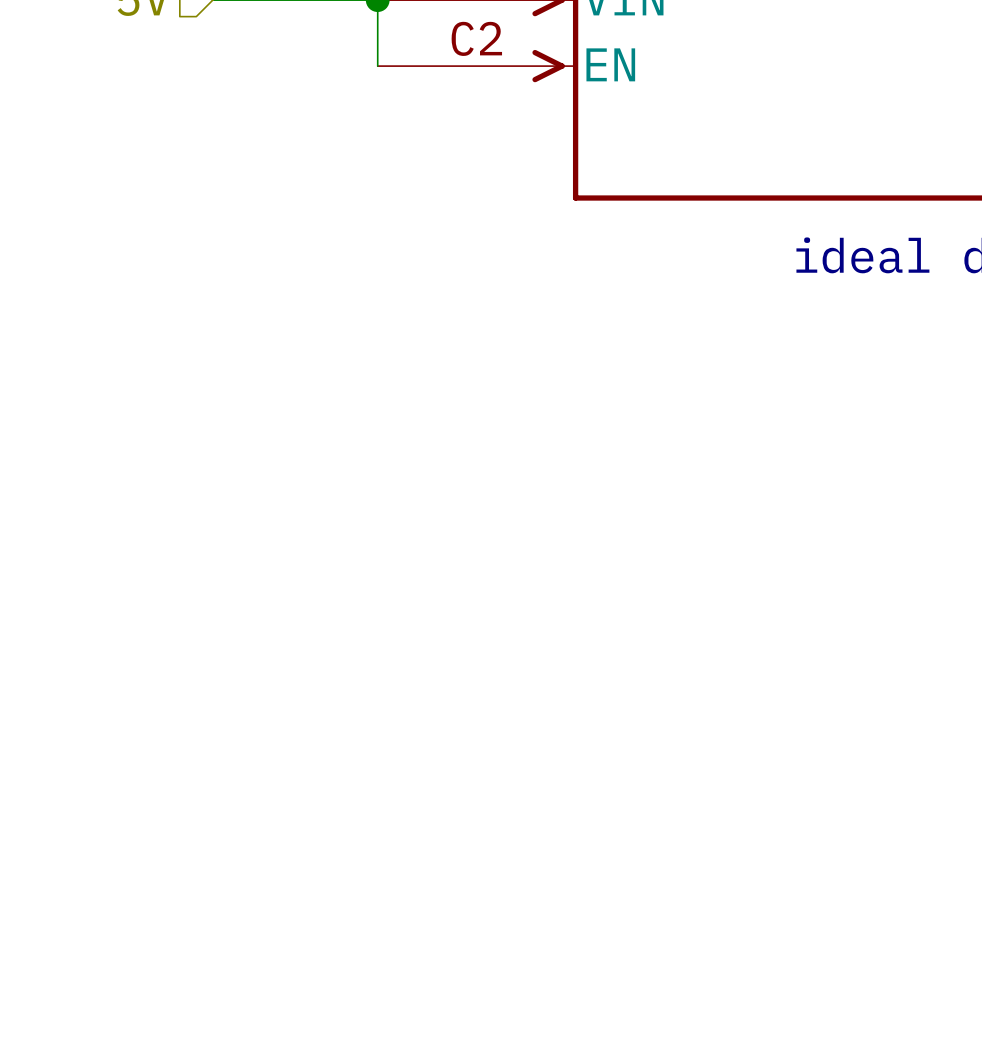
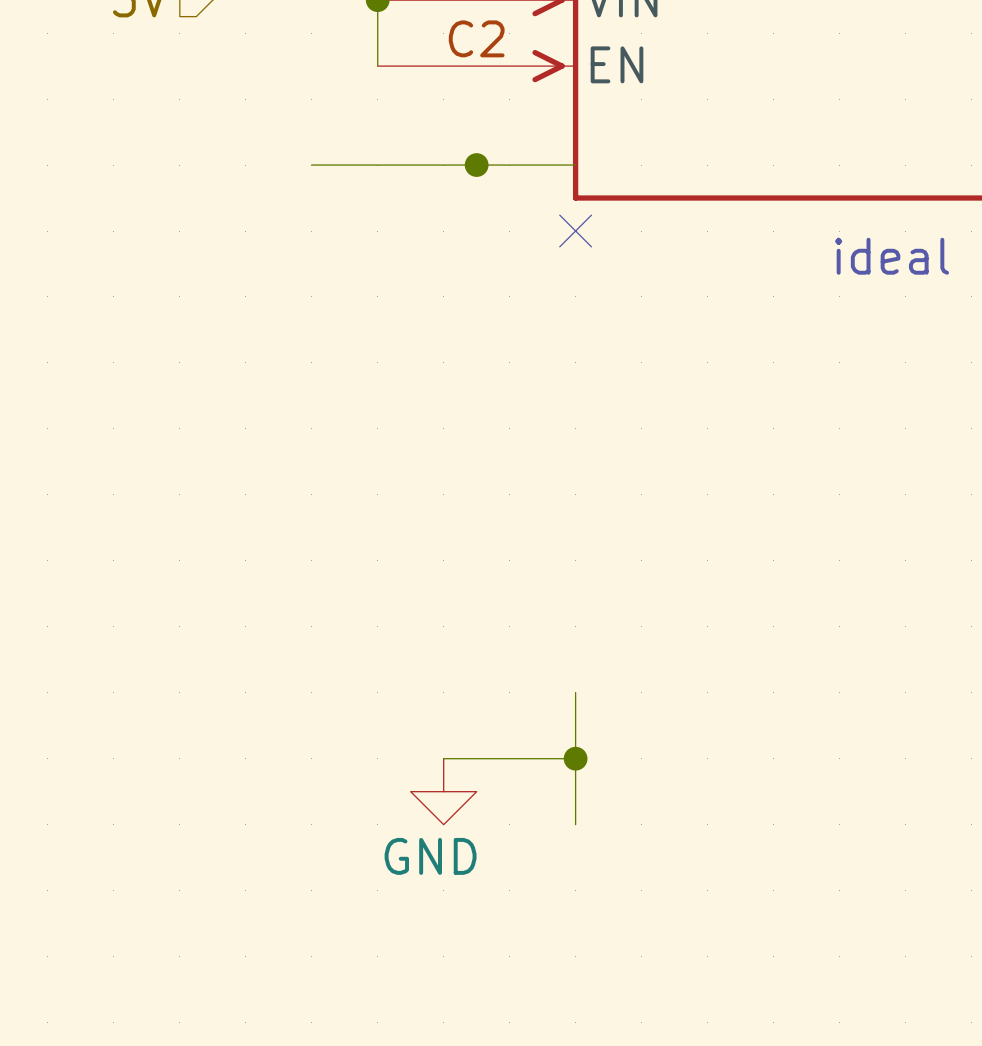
wire: (212, 0) (377, 0) -> none
wire: none -> (311, 165) (575, 165)
junction: none -> (476, 165)
no-connect mark: none -> (575, 231)
wire: none -> (575, 692) (575, 824)
wire: none -> (443, 758) (575, 758)
junction: none -> (575, 758)
power symbol: none -> GND (443, 791)

